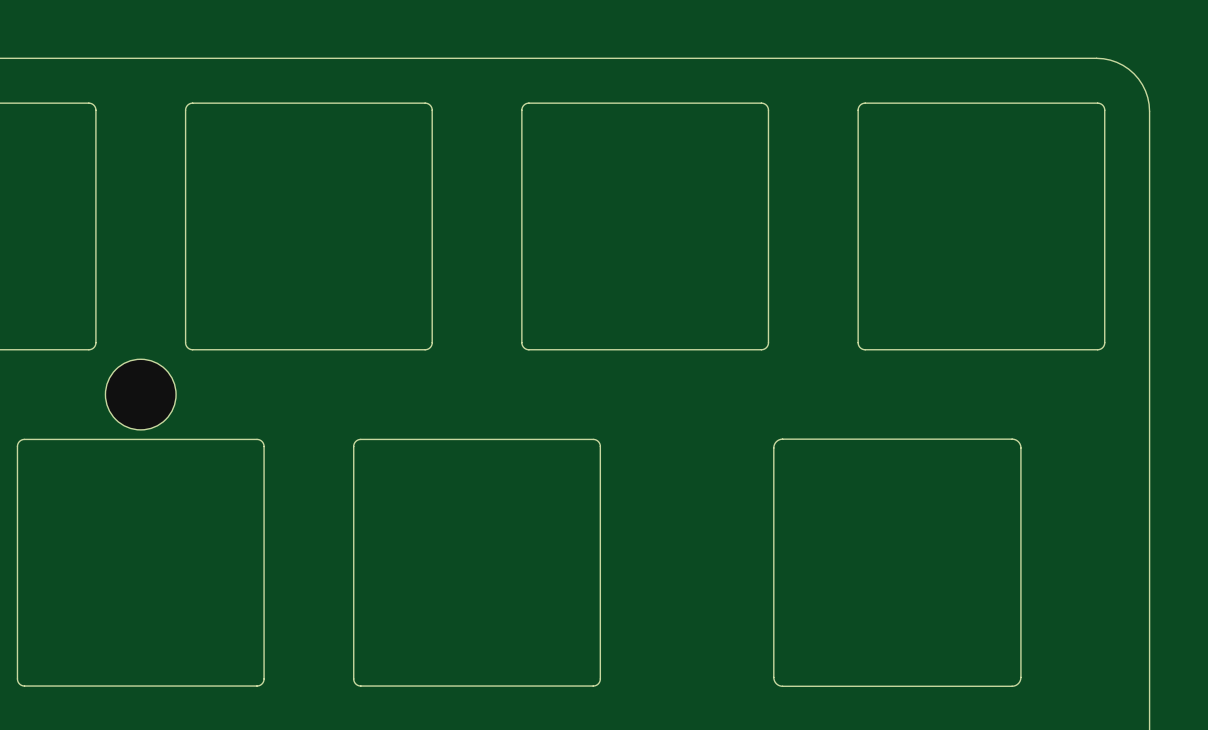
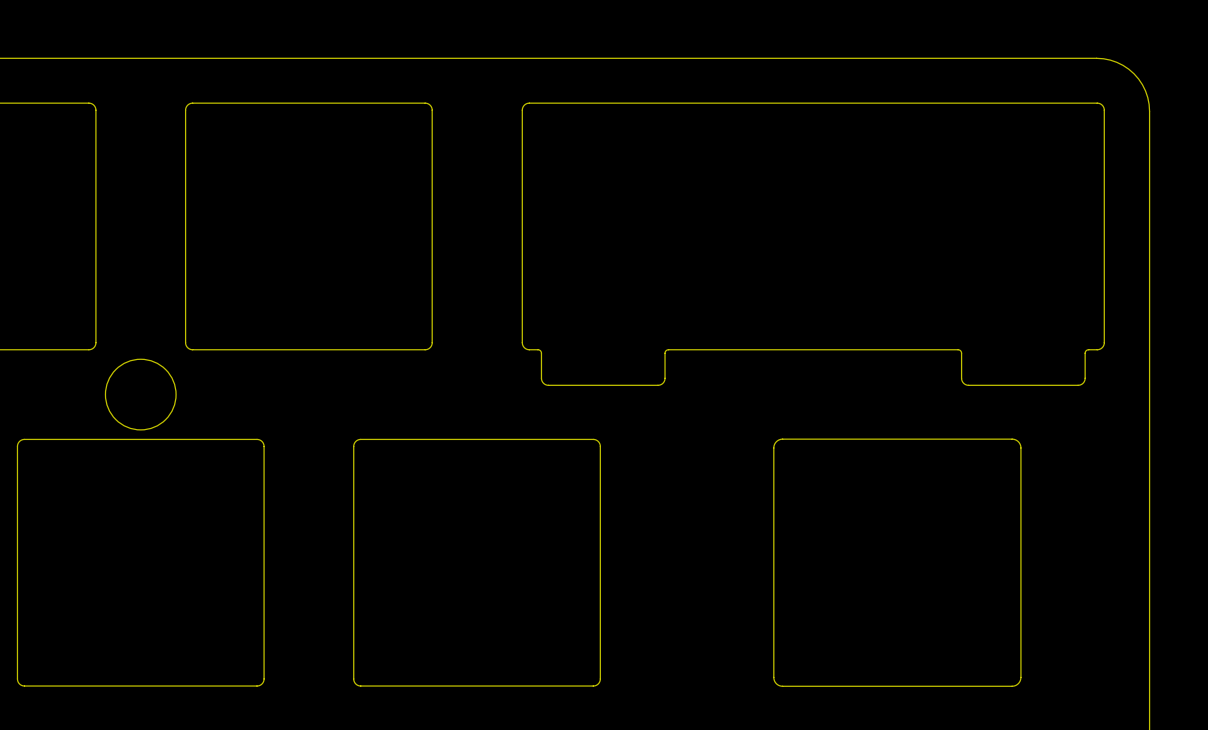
drawing: [521, 102, 769, 351] -> none
drawing: none -> [521, 102, 1105, 386]
drawing: [857, 102, 1106, 351] -> none

